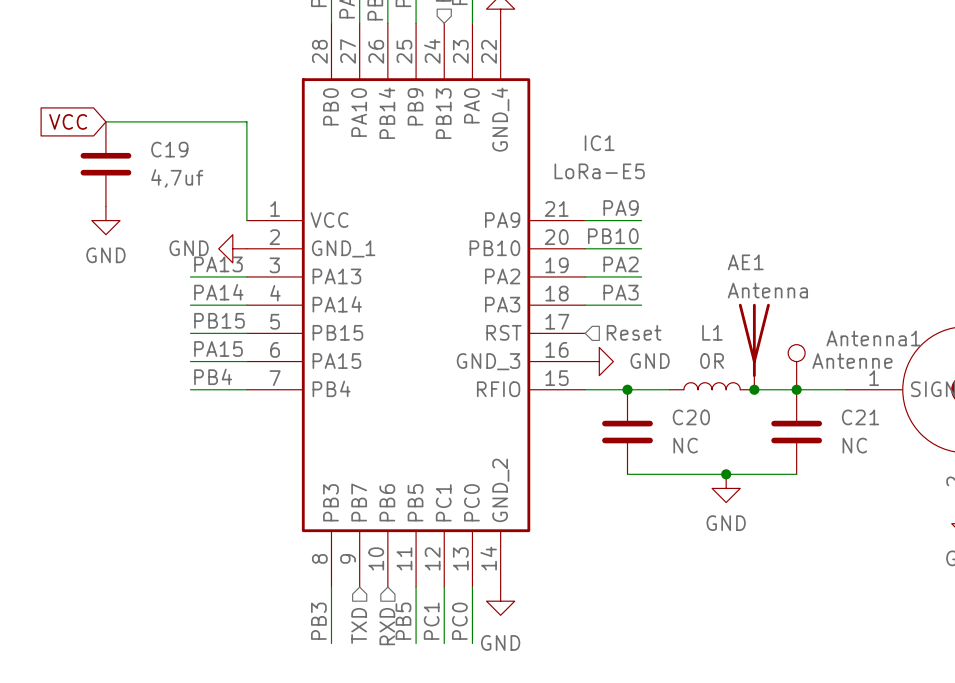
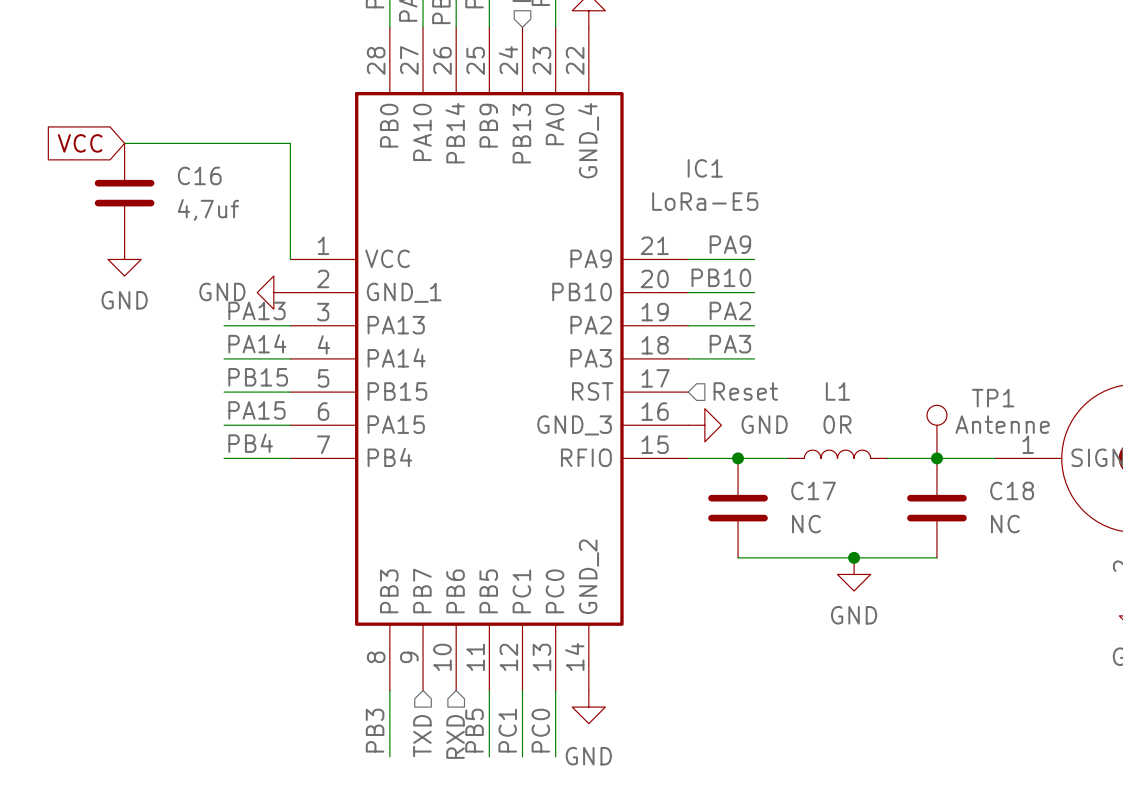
C19 name: C19 (169, 149) -> C16 (199, 175)
Antenna1 name: Antenna1 (873, 338) -> TP1 (993, 398)
AE1: Antenna (754, 346) -> none
junction: (754, 389) -> none
C20 name: C20 (691, 417) -> C17 (813, 490)
C21 name: C21 (860, 417) -> C18 (1012, 490)

